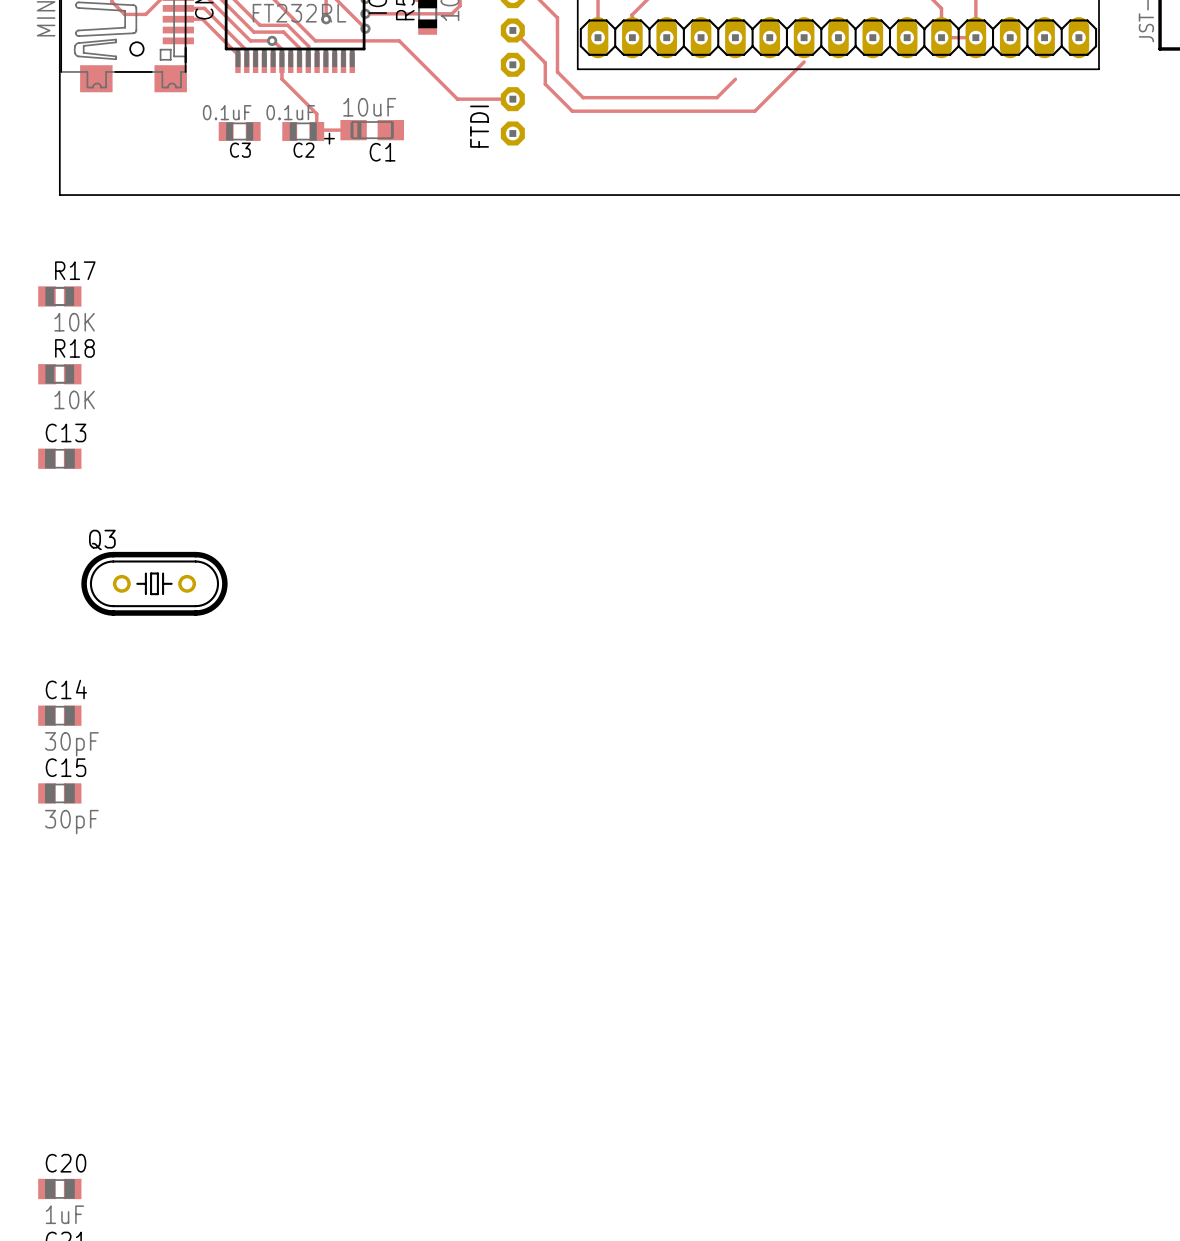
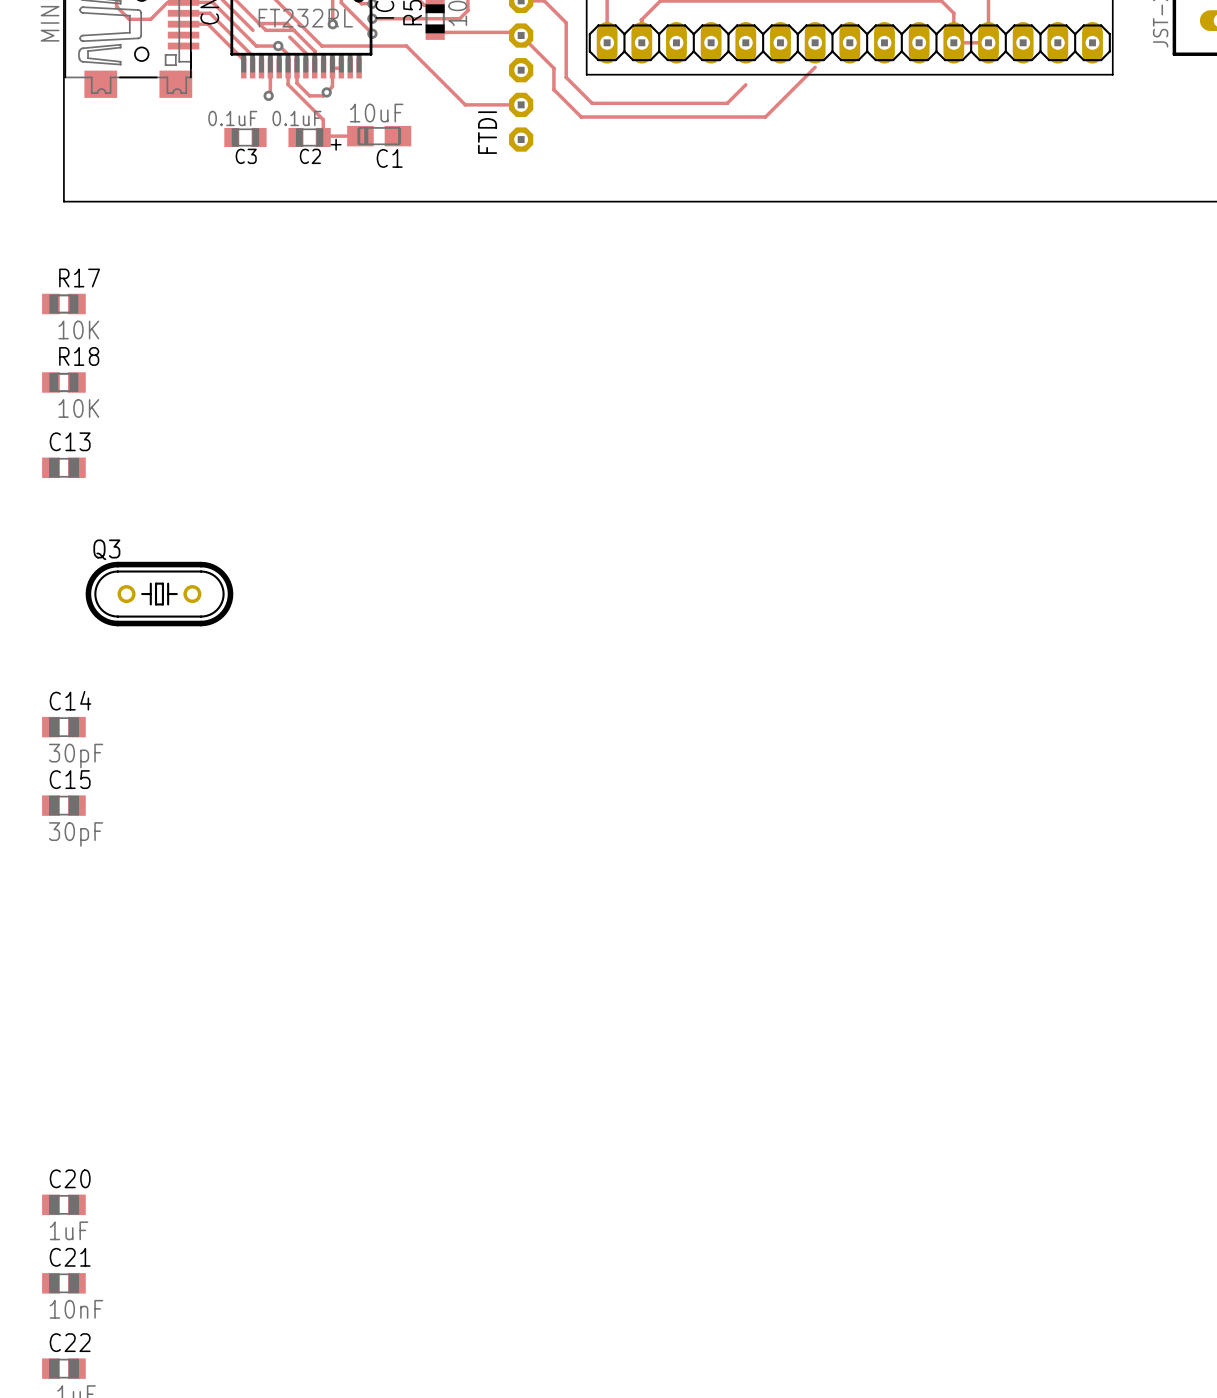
track: none -> (259, 23) (287, 23) (293, 30)
track: (247, 25) (253, 32) (283, 32) -> none
track: none -> (435, 32) (518, 32)
track: none -> (270, 68) (270, 94) (268, 95)
track: none -> (296, 68) (296, 83) (309, 95) (323, 95) (332, 86) (332, 68) (341, 68)
via: none -> (326, 92)
via: none -> (268, 95)

